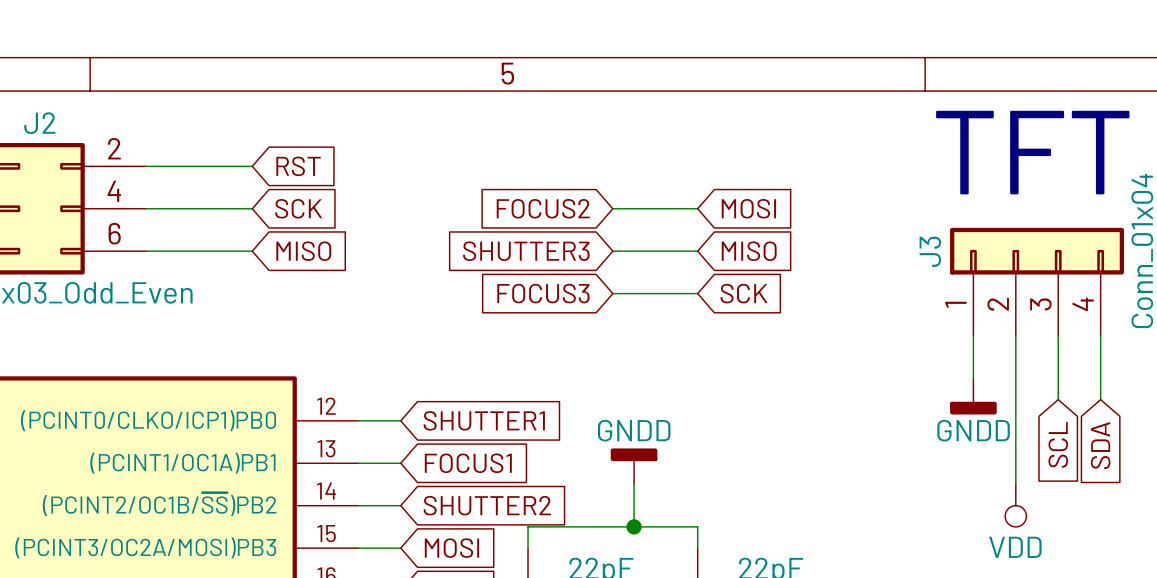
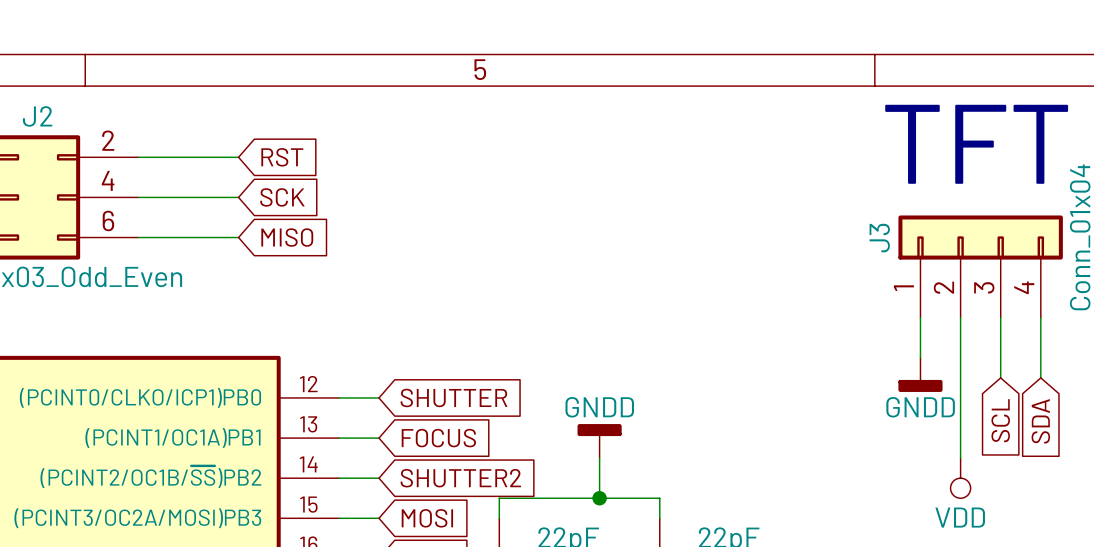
global label: FOCUS2 (543, 208) -> none
wire: (612, 208) (697, 208) -> none
global label: MOSI (748, 208) -> none
global label: SHUTTER3 (526, 251) -> none
wire: (612, 251) (697, 251) -> none
global label: MISO (749, 251) -> none
global label: FOCUS3 (543, 293) -> none
wire: (612, 293) (697, 293) -> none
global label: SCK (744, 293) -> none
global label: SHUTTER1 (484, 420) -> SHUTTER (454, 397)
global label: FOCUS1 (468, 463) -> FOCUS (438, 438)

